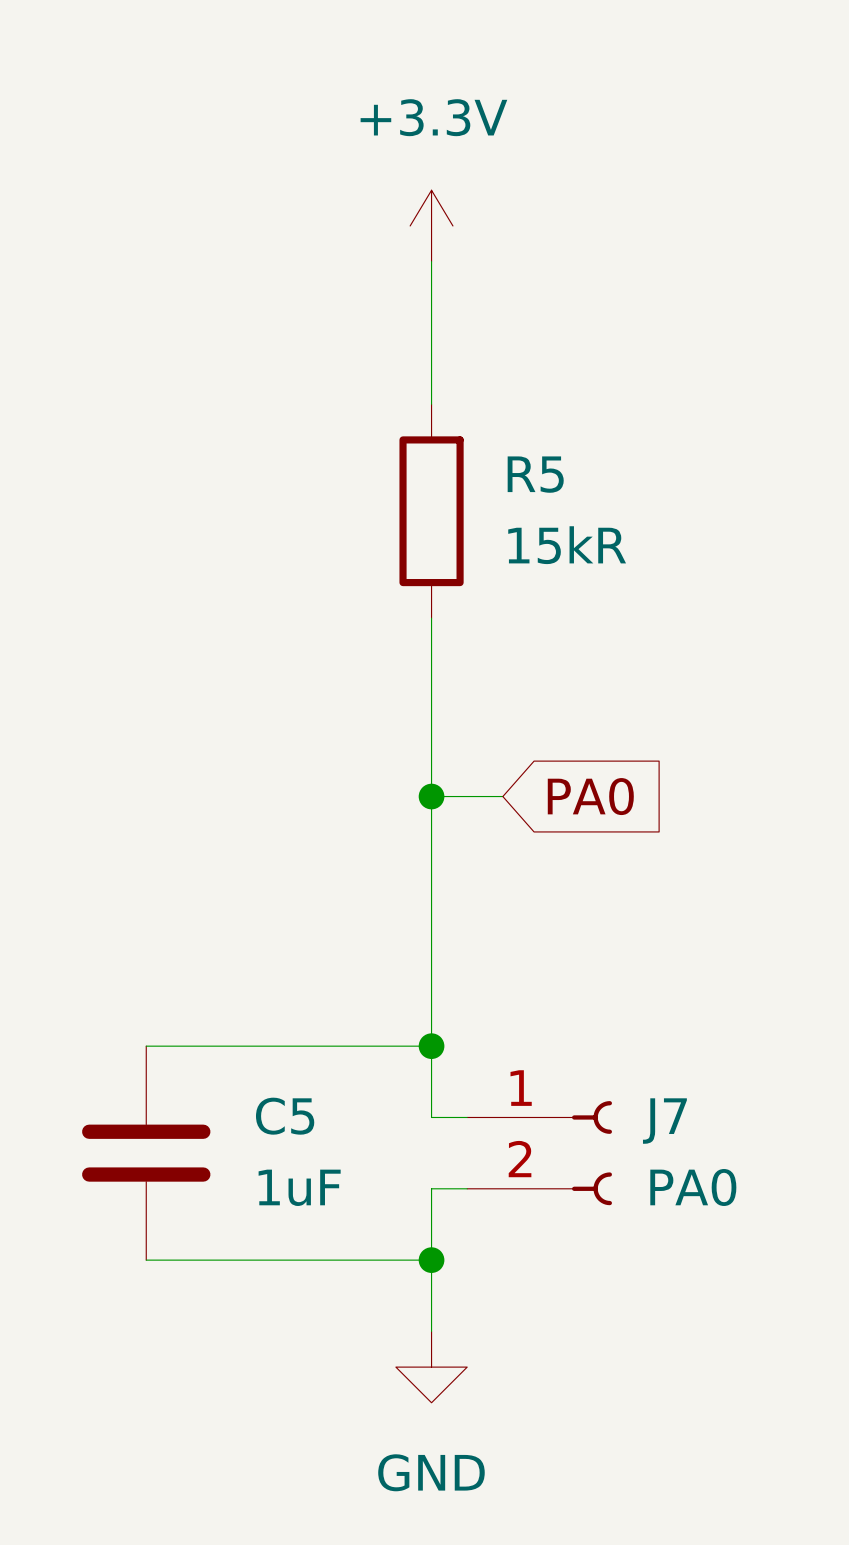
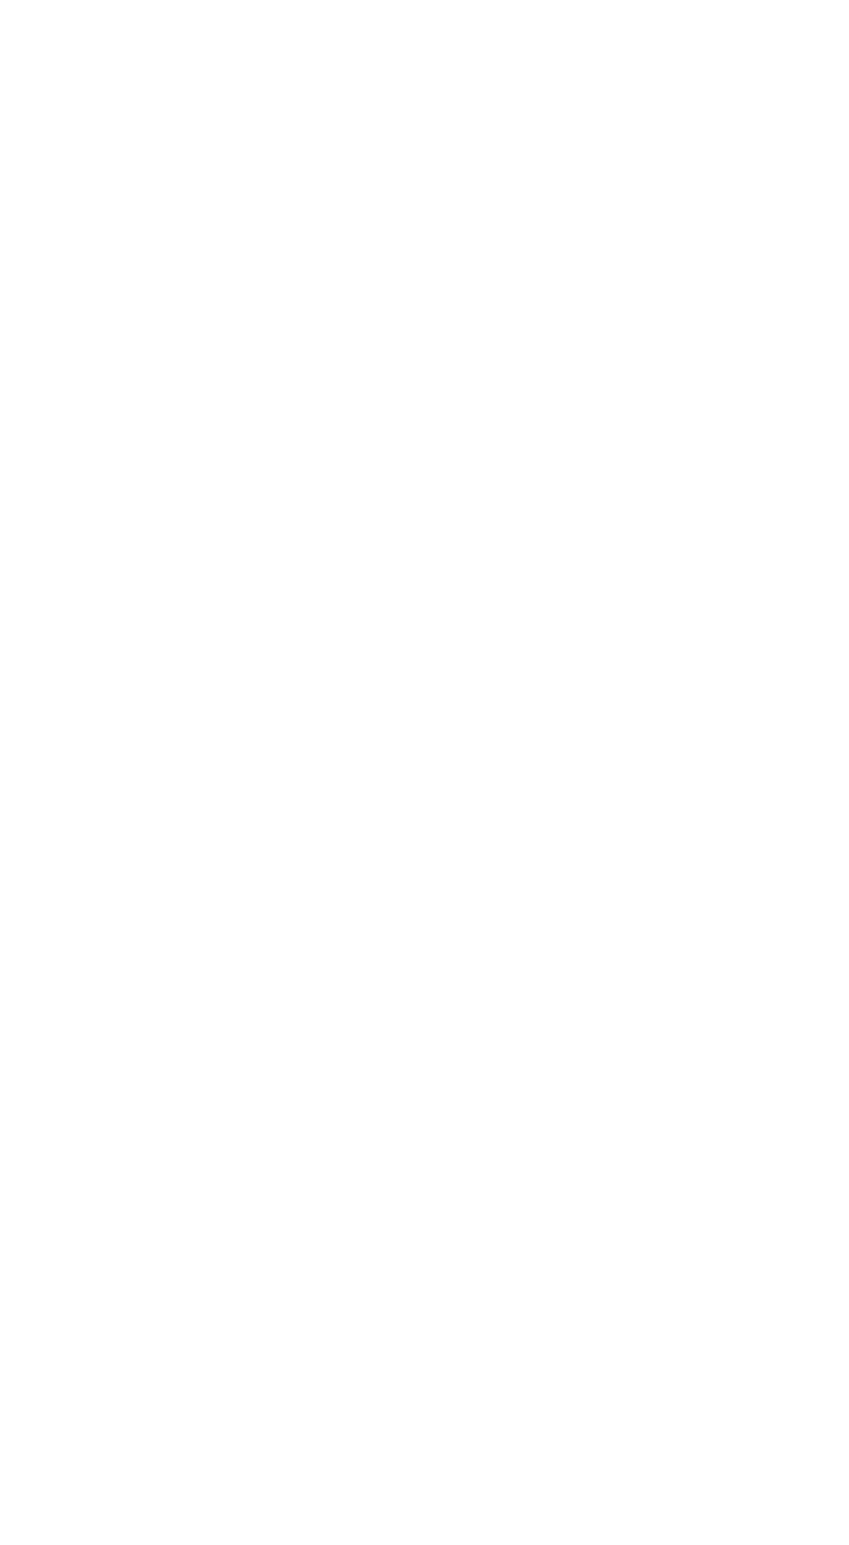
power symbol: +3.3V (431, 225) -> none
wire: (431, 261) (431, 404) -> none
R5: 15kR (431, 511) -> none
wire: (431, 618) (431, 1117) (467, 1117) -> none
wire: (431, 796) (502, 796) -> none
junction: (431, 796) -> none
global label: PA0 (590, 796) -> none
wire: (146, 1046) (431, 1046) -> none
junction: (431, 1046) -> none
C5: 1uF (146, 1153) -> none
J7: PA0 (539, 1153) -> none
wire: (467, 1188) (431, 1188) (431, 1331) -> none
wire: (146, 1260) (431, 1260) -> none
junction: (431, 1260) -> none
power symbol: GND (431, 1367) -> none

